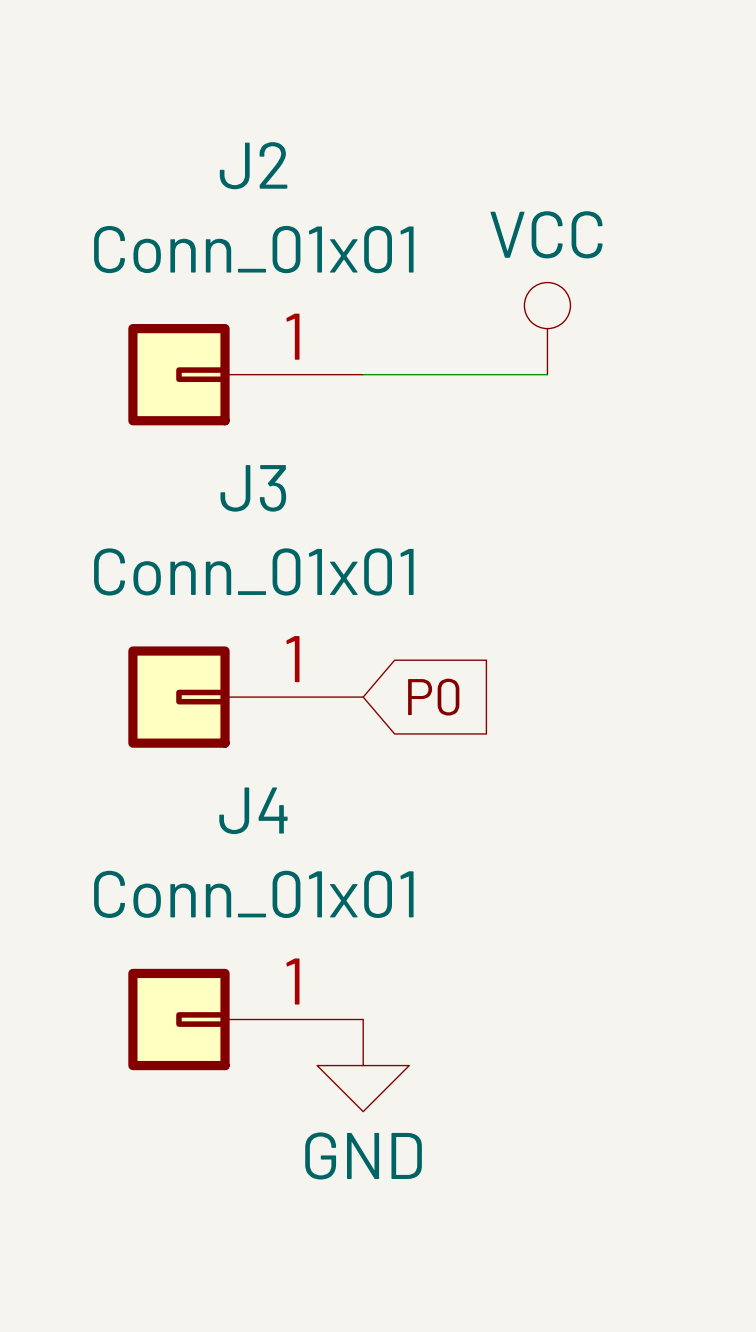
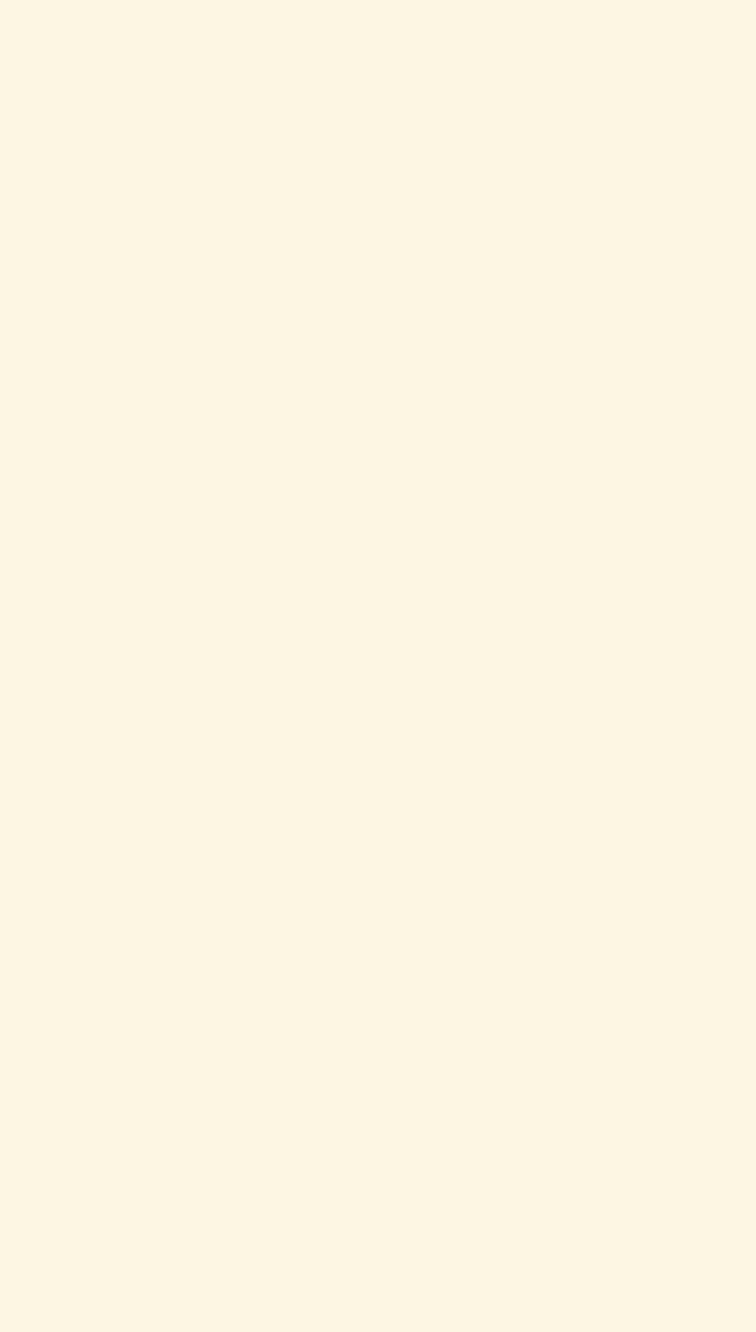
power symbol: VCC (547, 328) -> none
J2: Conn_01x01 (245, 374) -> none
wire: (363, 374) (547, 374) -> none
J3: Conn_01x01 (245, 697) -> none
global label: P0 (433, 697) -> none
J4: Conn_01x01 (245, 1019) -> none
power symbol: GND (363, 1065) -> none

